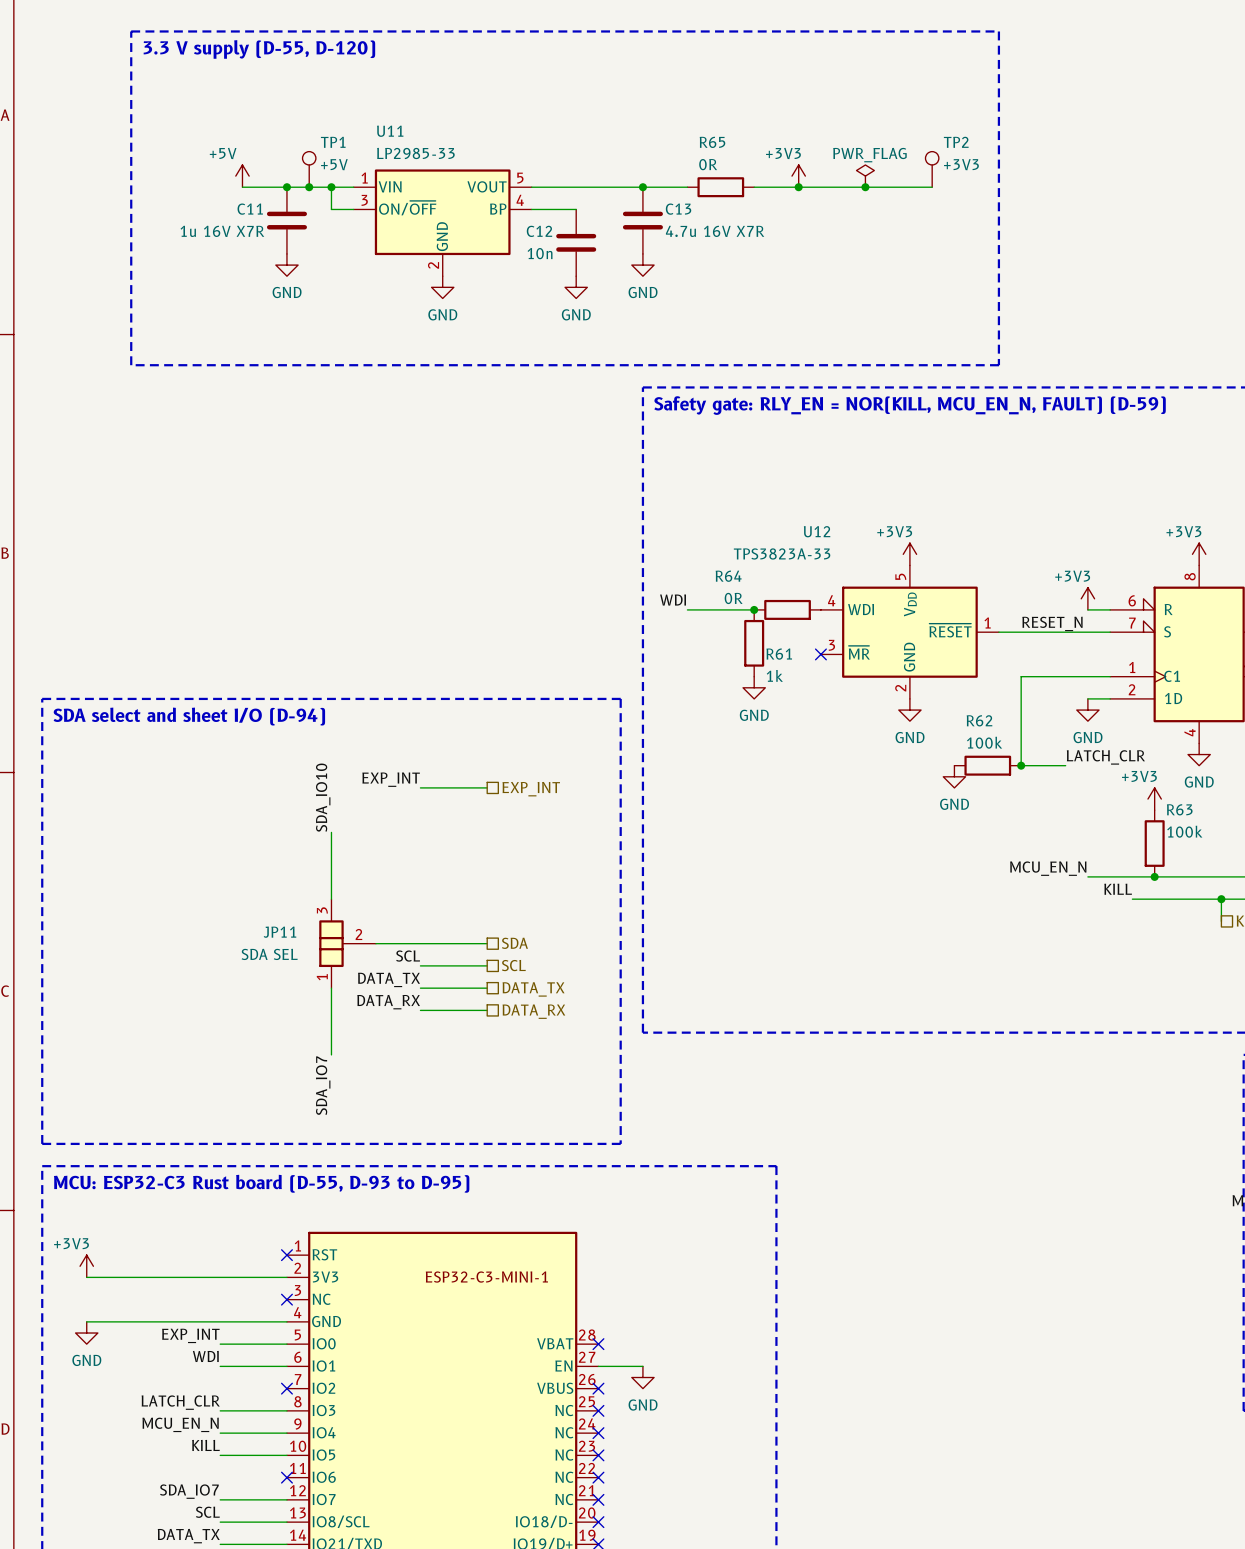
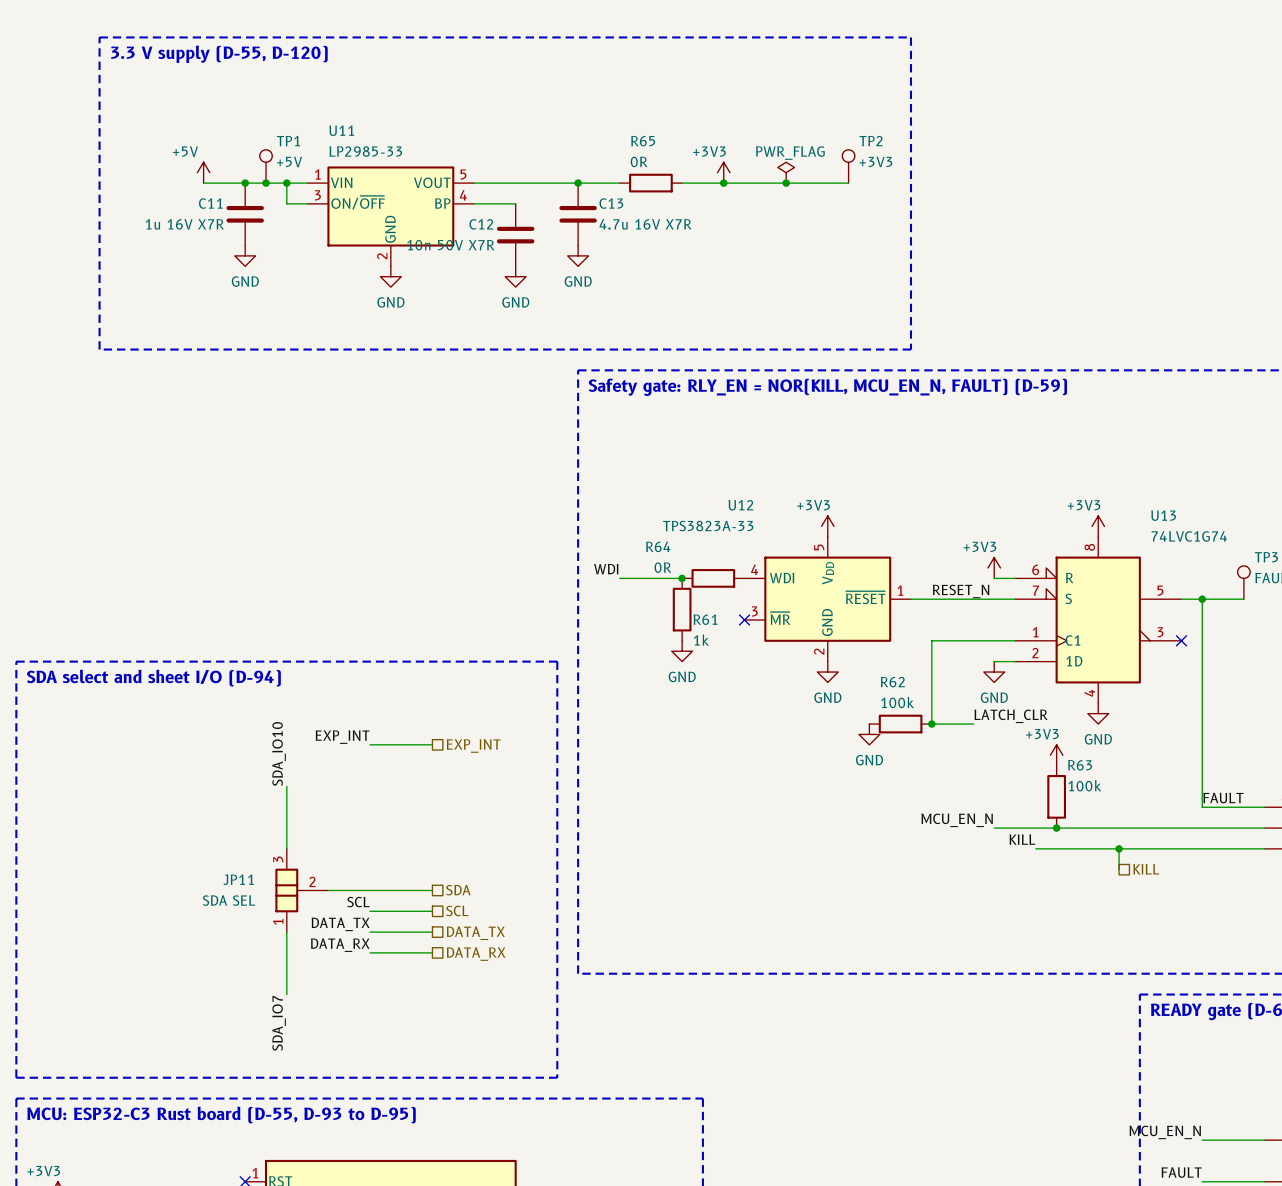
C12 value: 10n (540, 253) -> 10n 50V X7R (450, 245)

